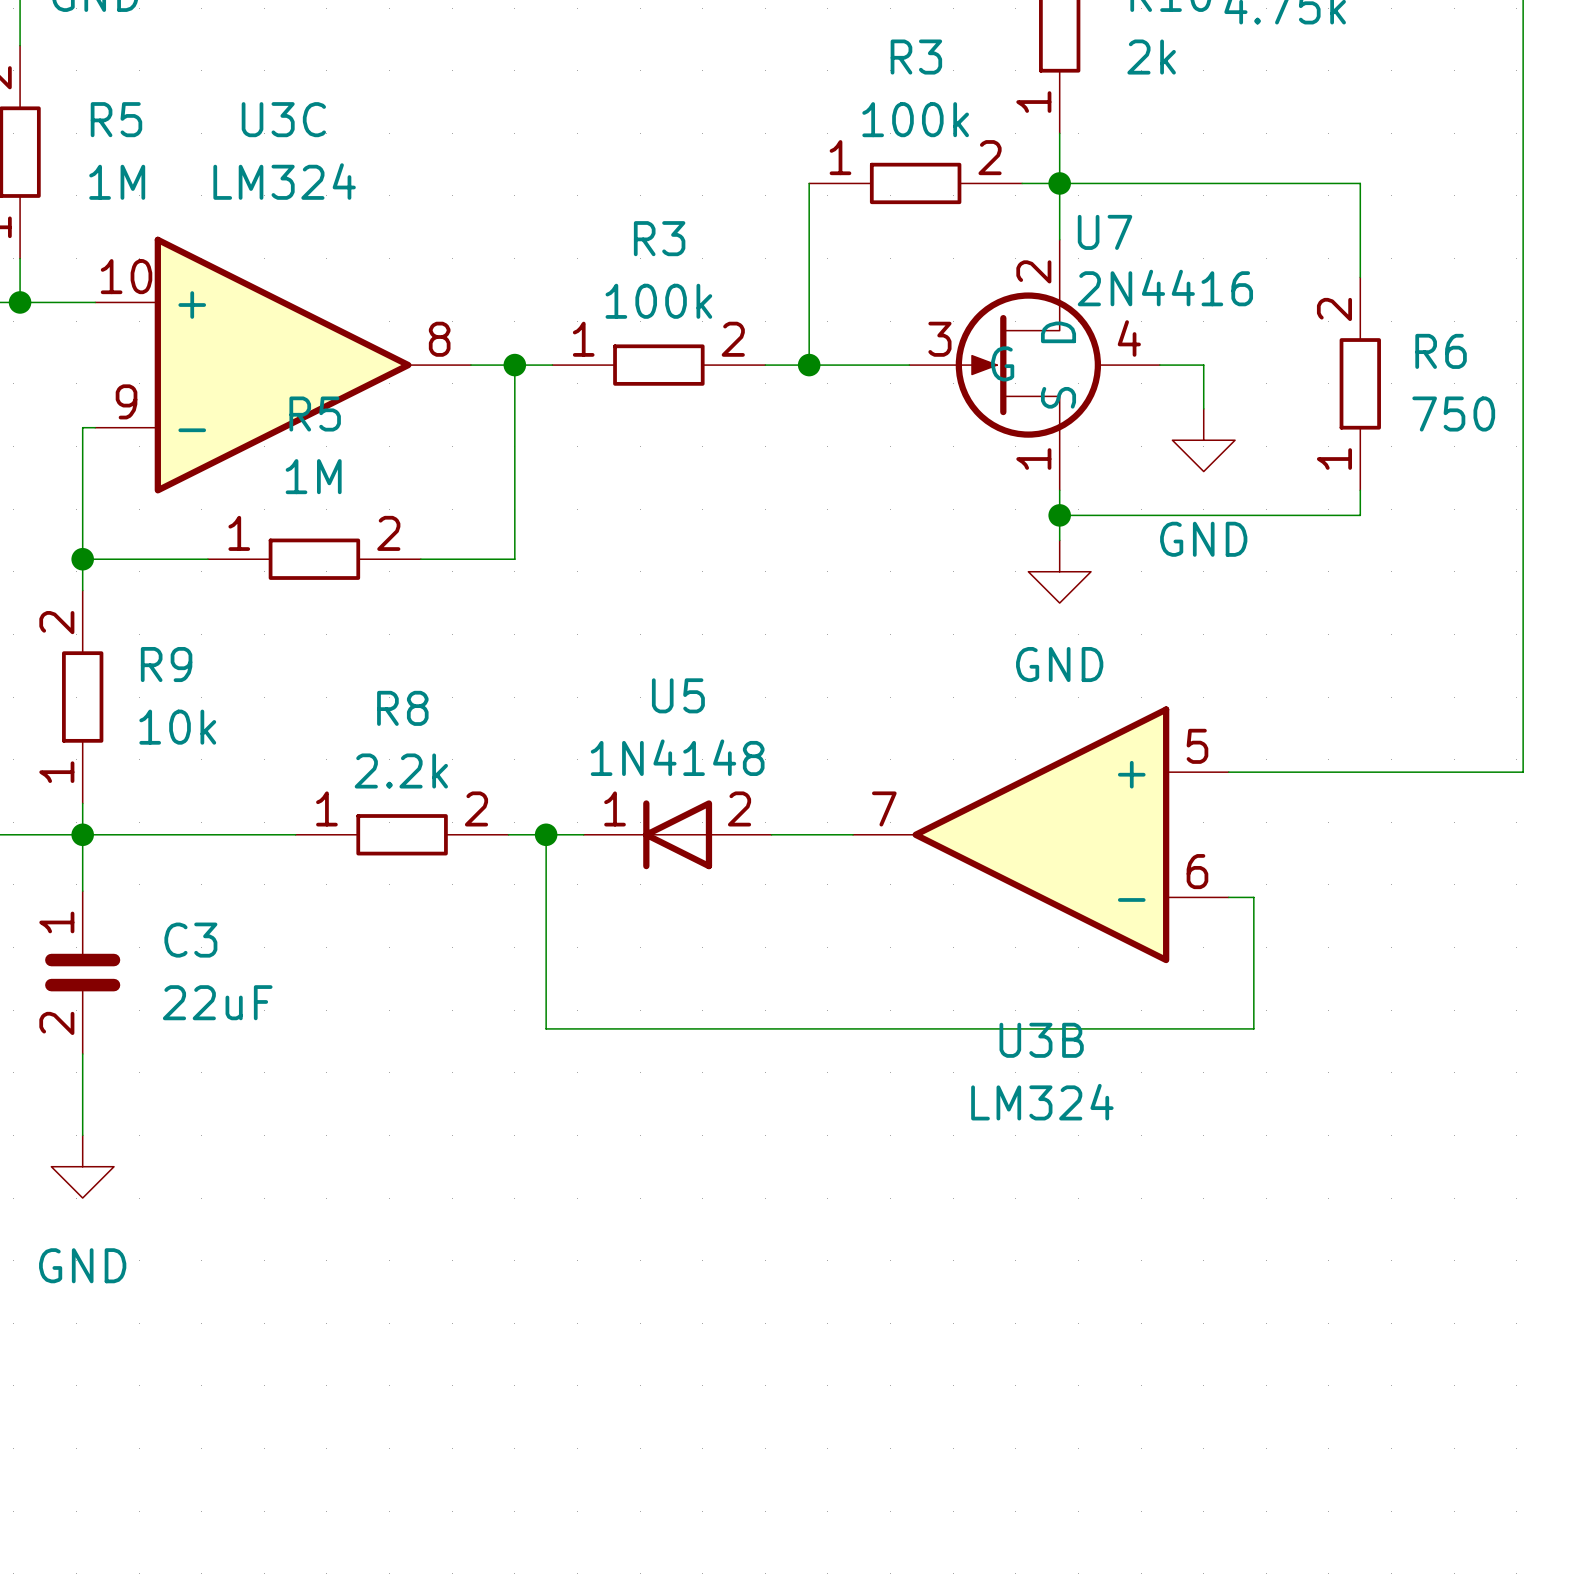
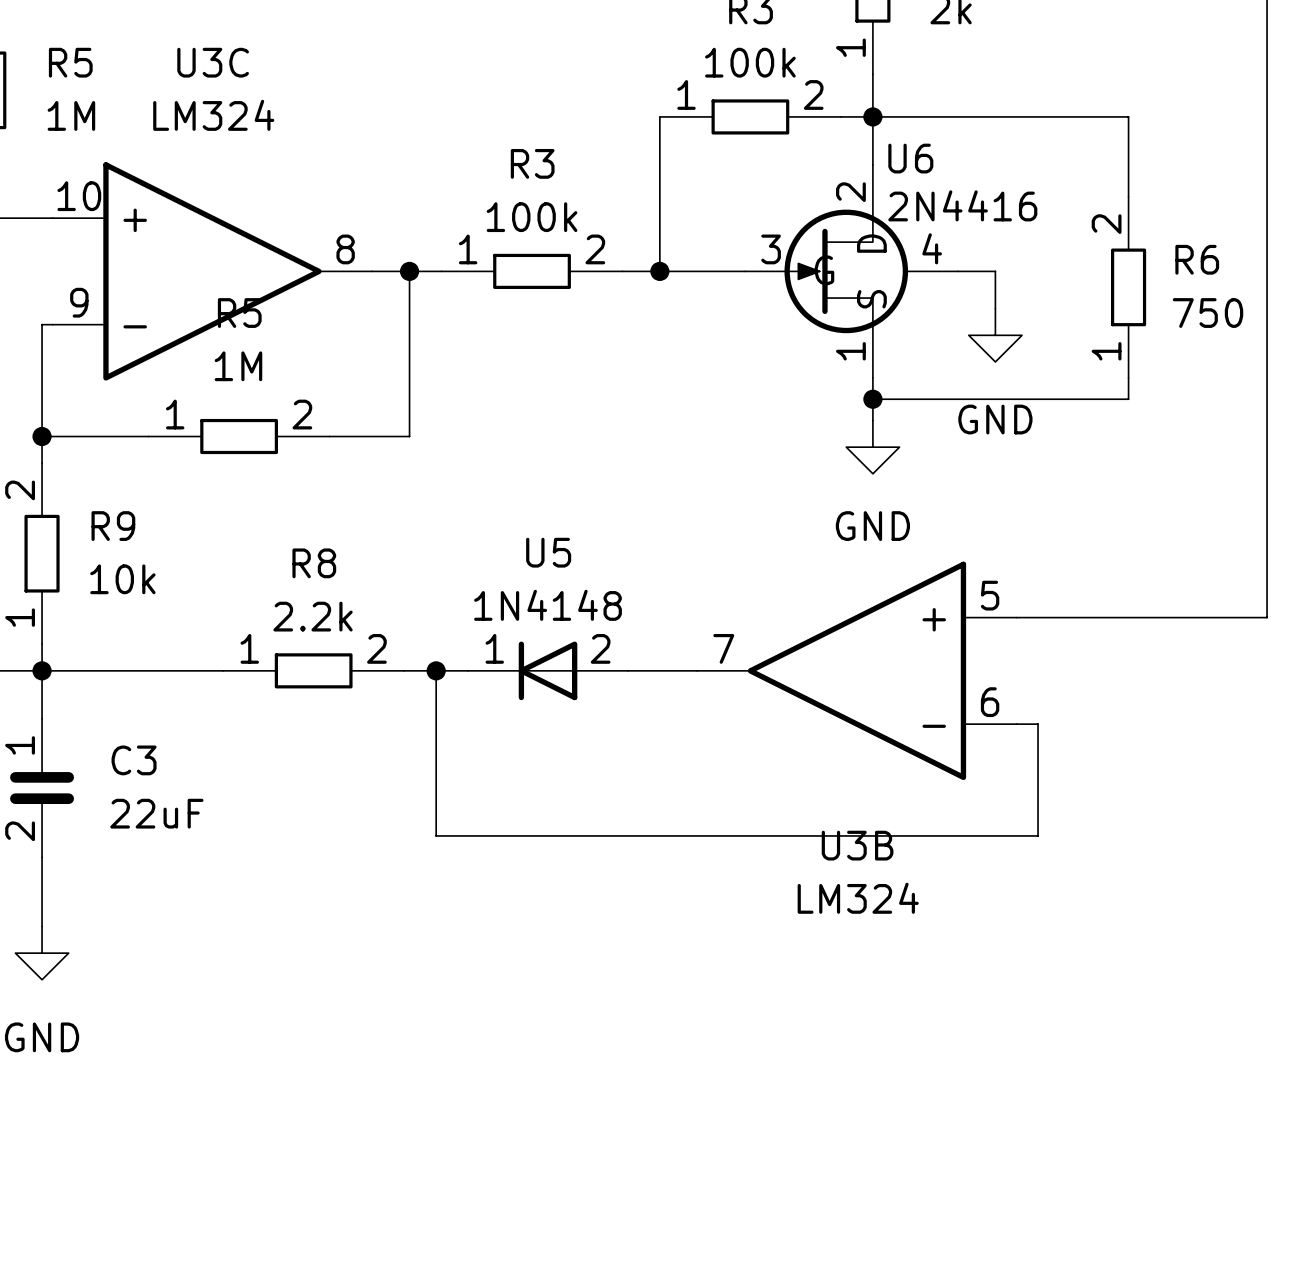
U7 name: U7 (1105, 232) -> U6 (910, 158)

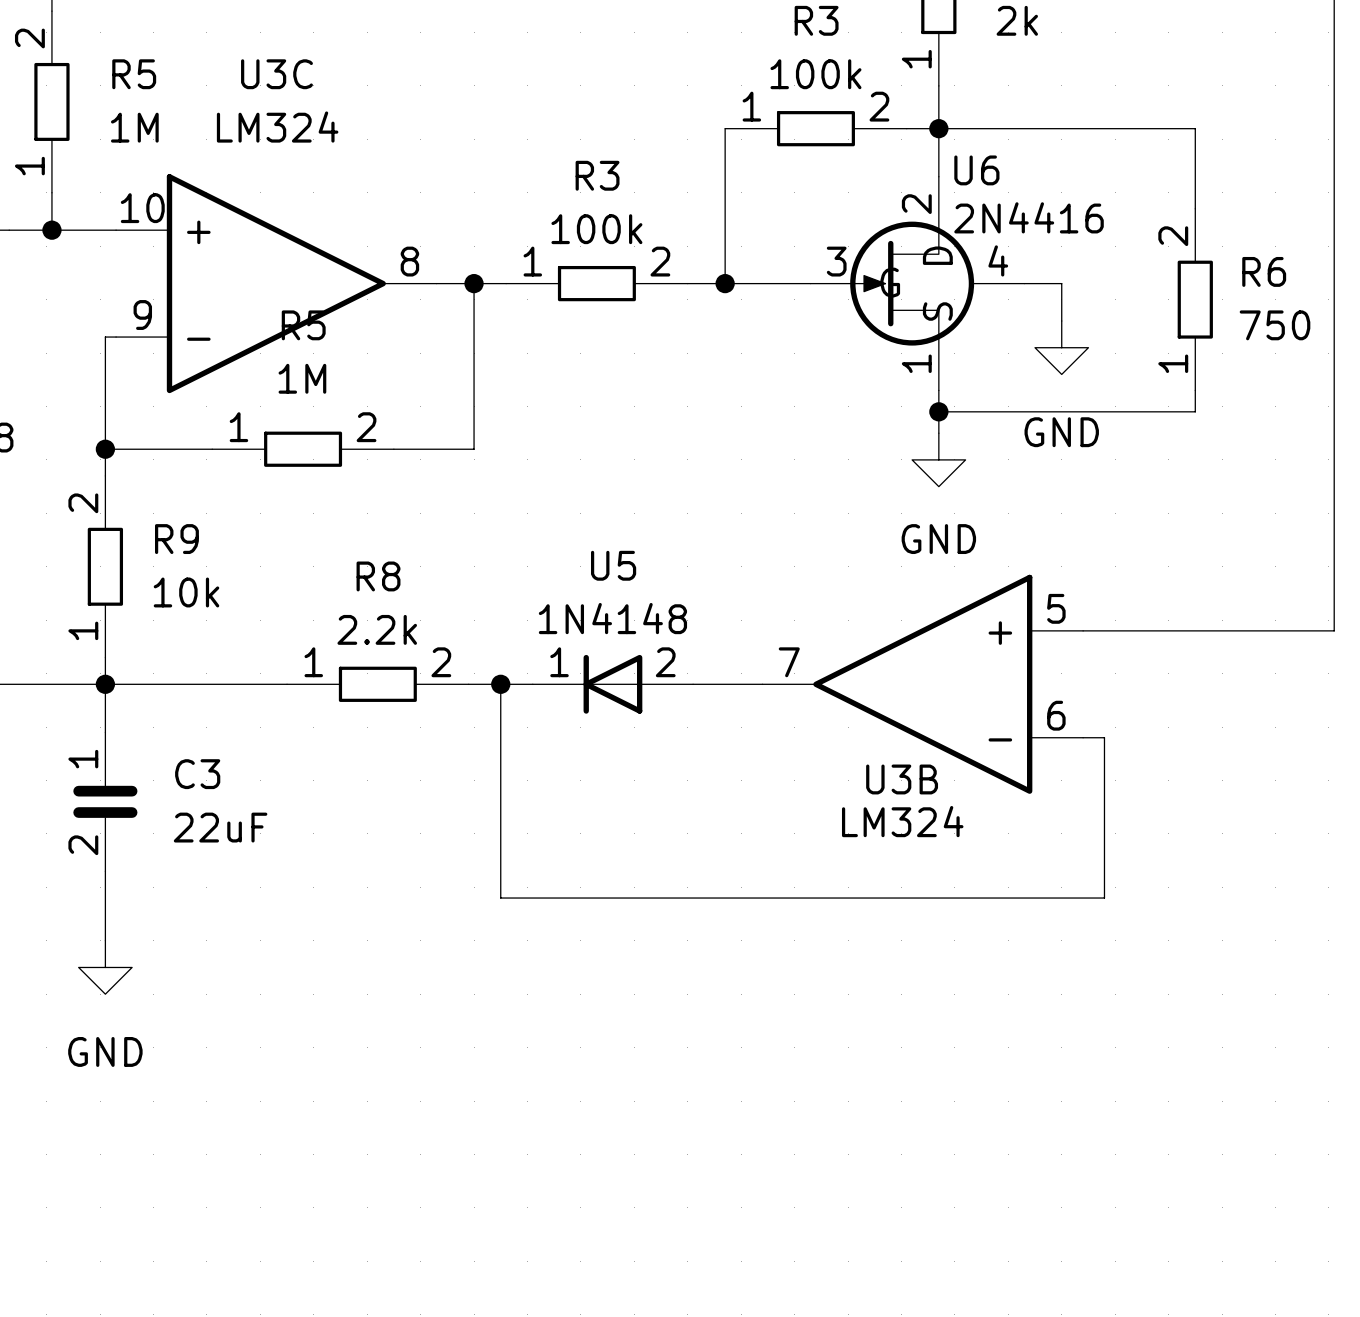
wire: (436, 835) (1038, 835) -> (500, 849) (500, 898) (1104, 898) (1104, 849)
U3B name position: U3B (857, 845) -> U3B (902, 779)
U3B value position: LM324 (858, 898) -> LM324 (902, 821)

